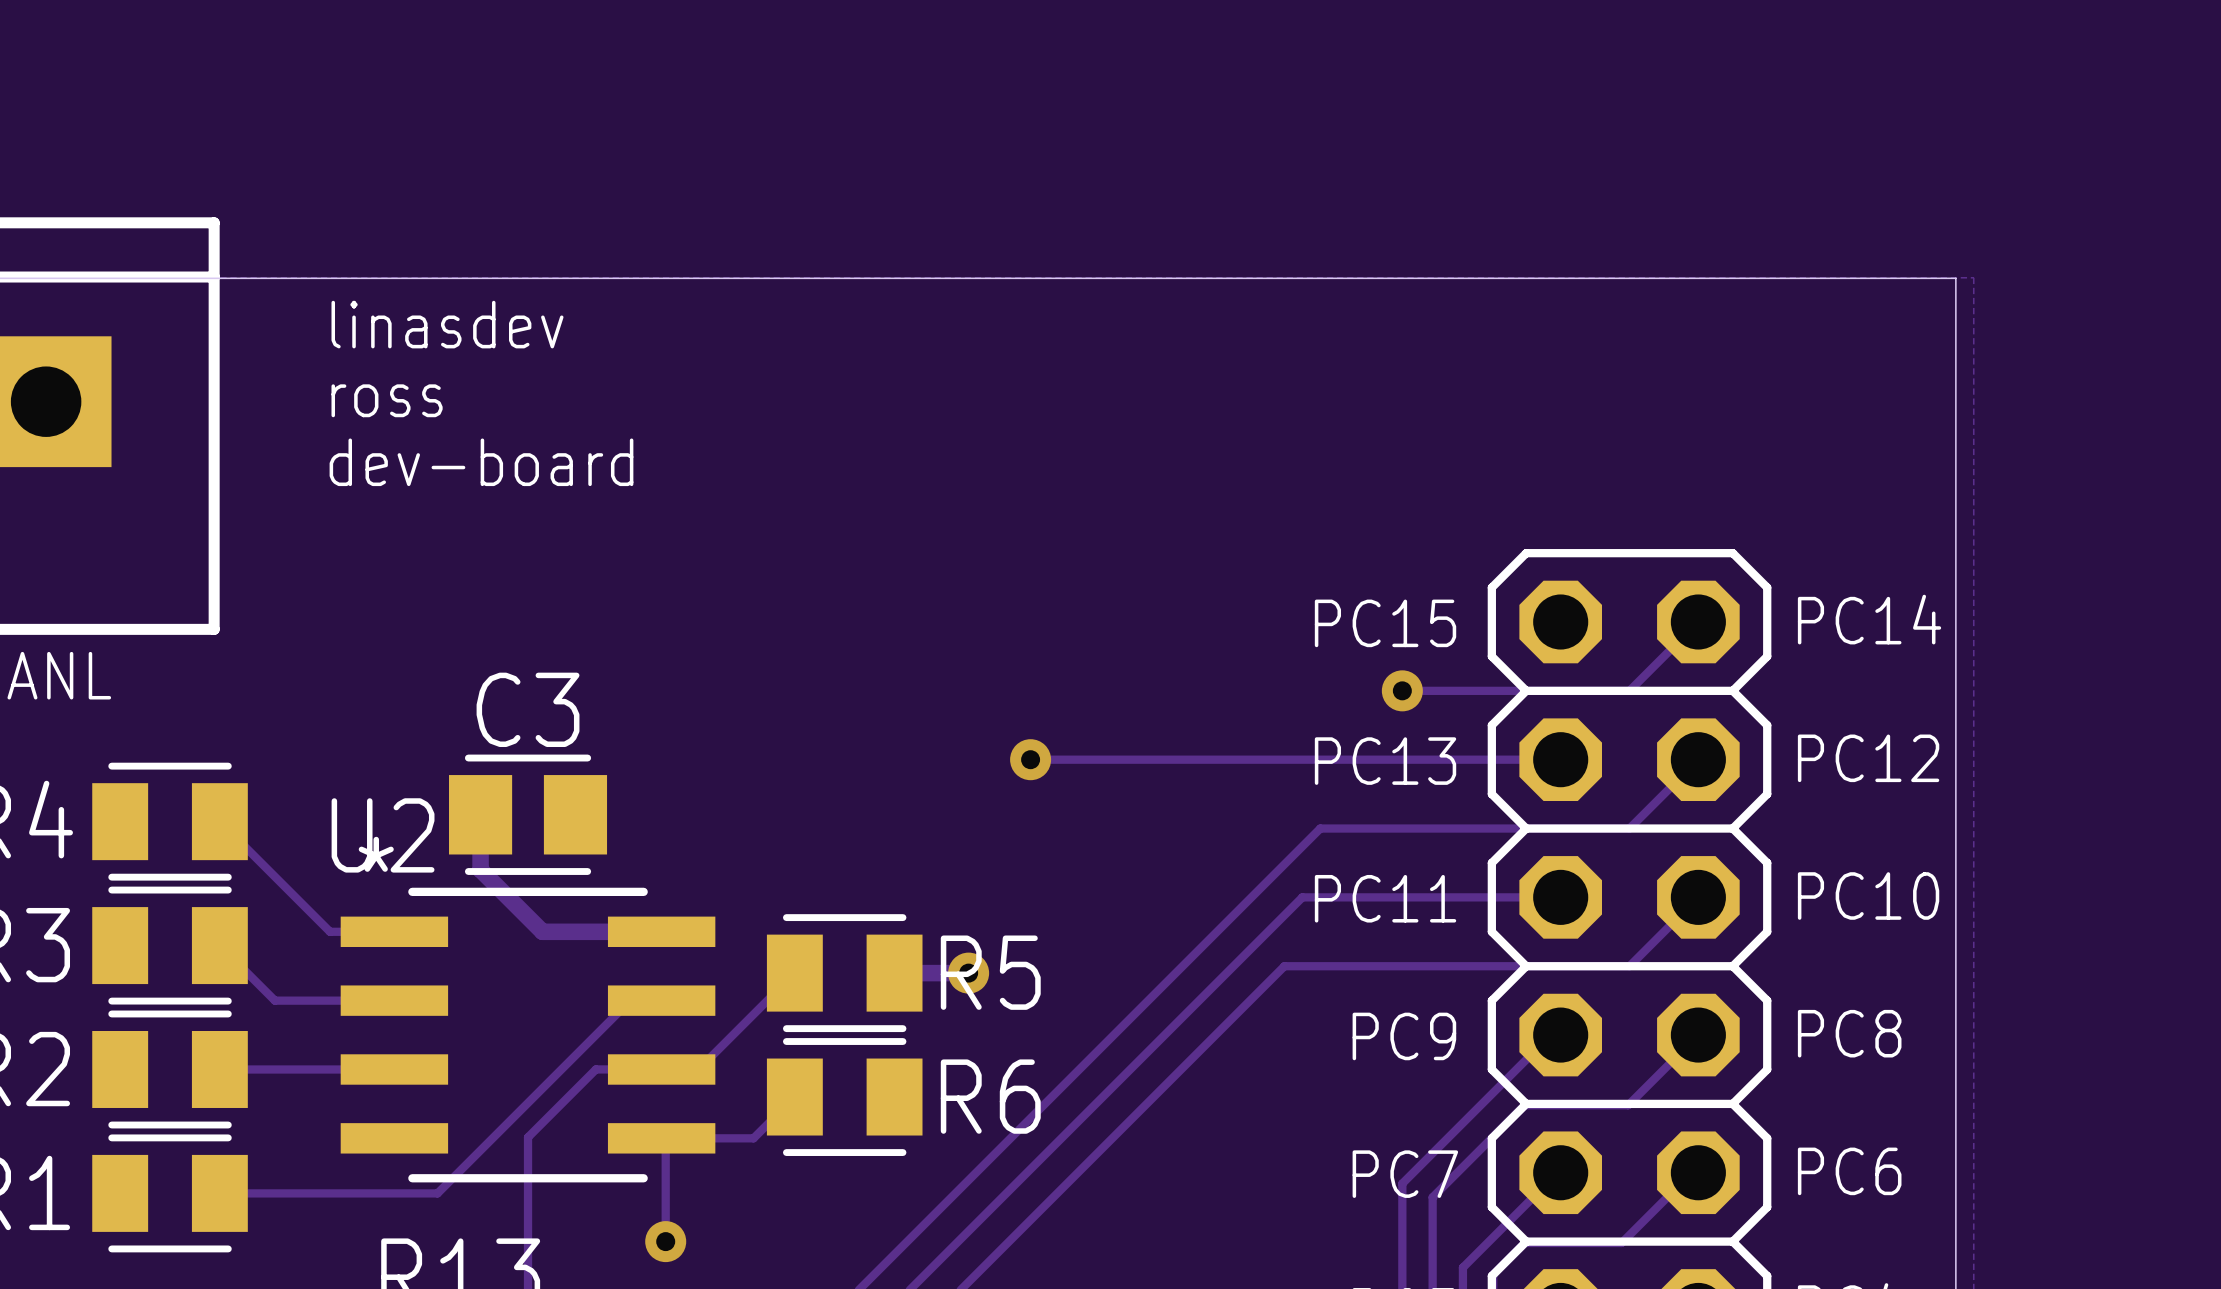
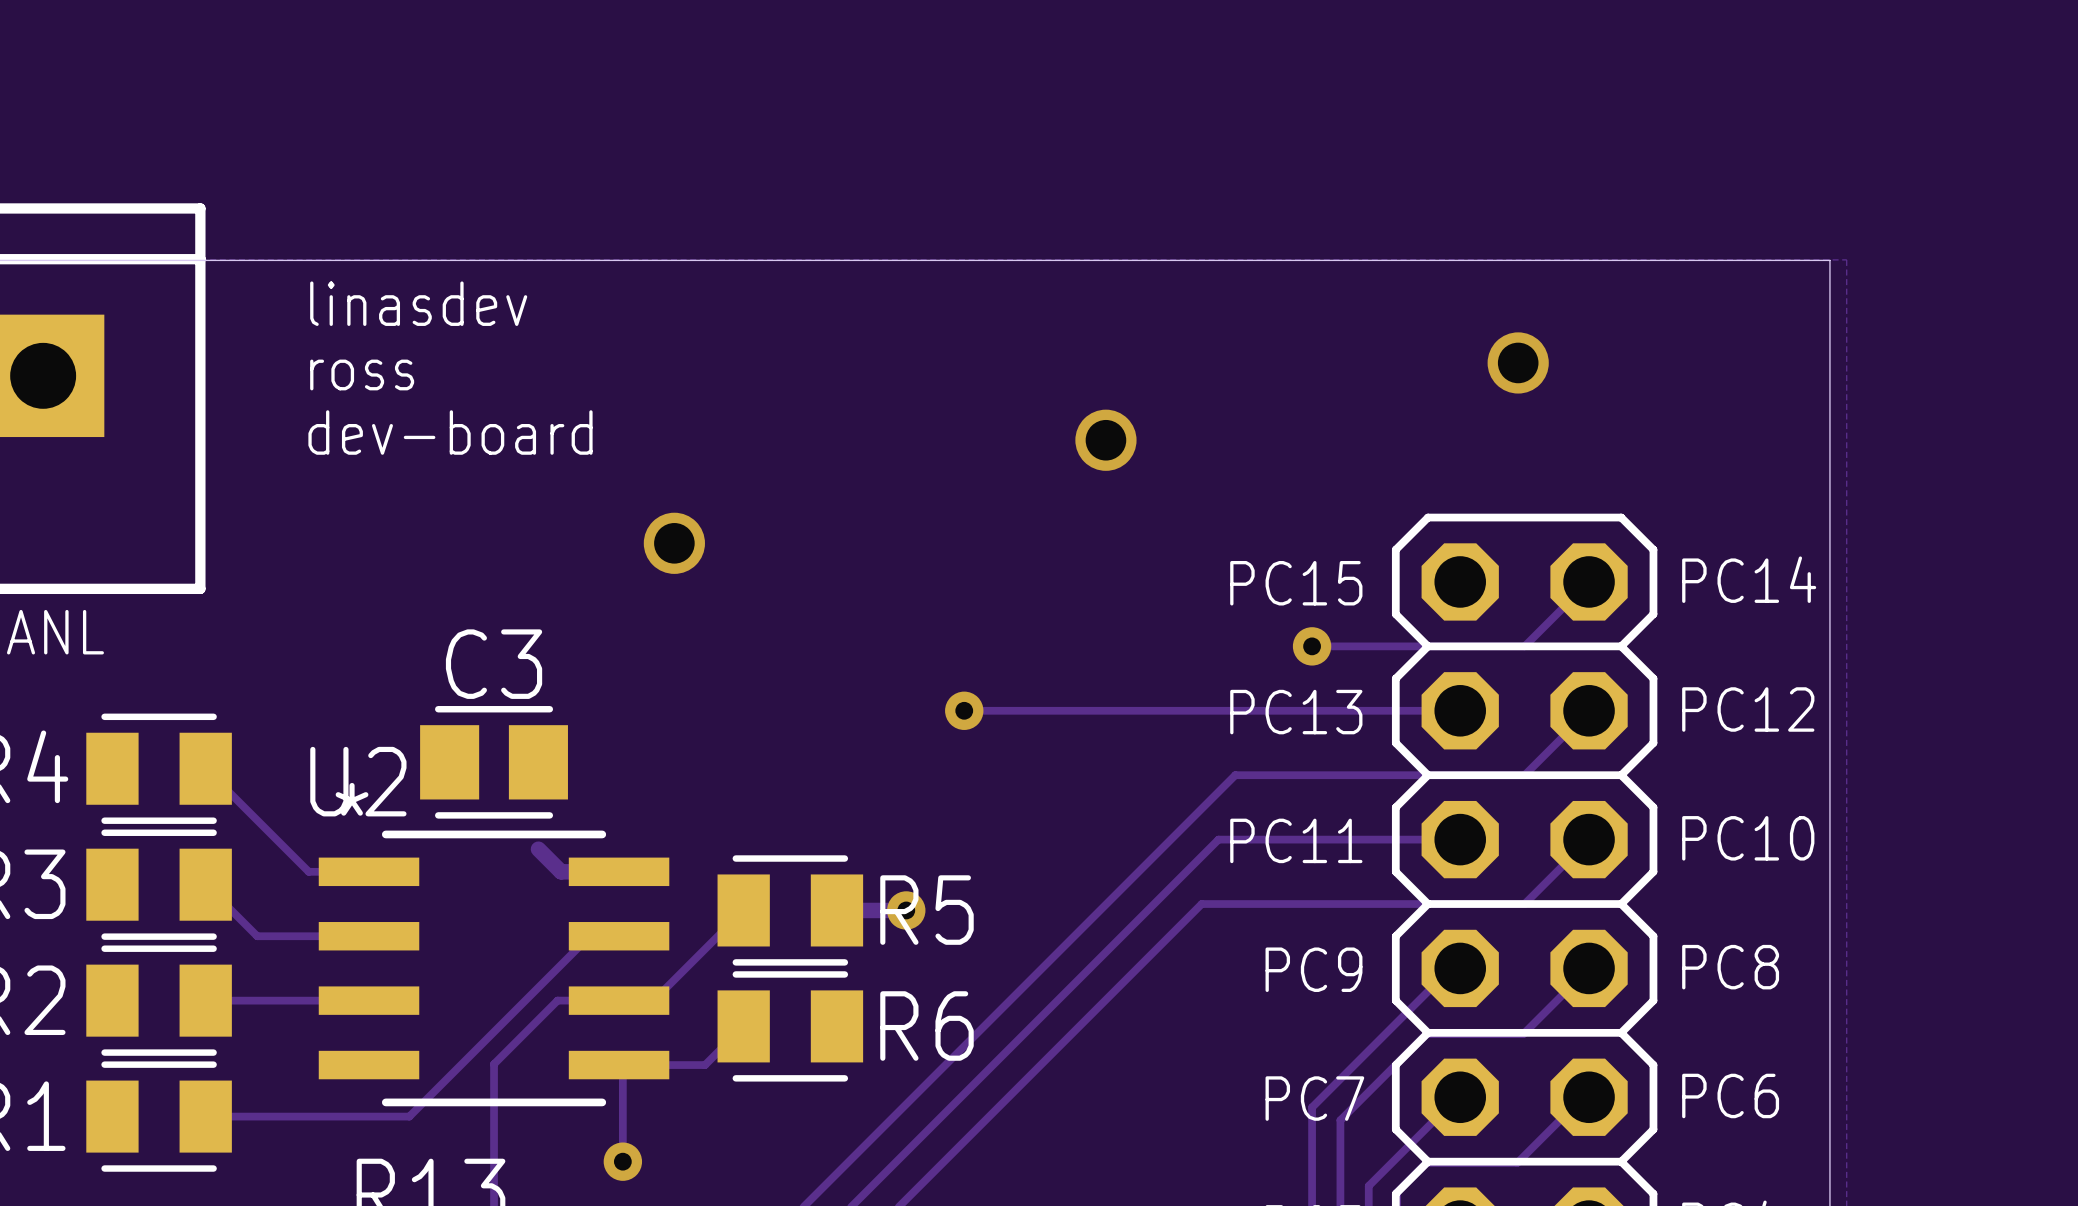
via: none -> (1518, 362)
via: none -> (1105, 440)
via: none -> (674, 543)
track: (480, 814) (480, 869) (542, 931) (599, 931) -> (538, 849) (561, 871)

